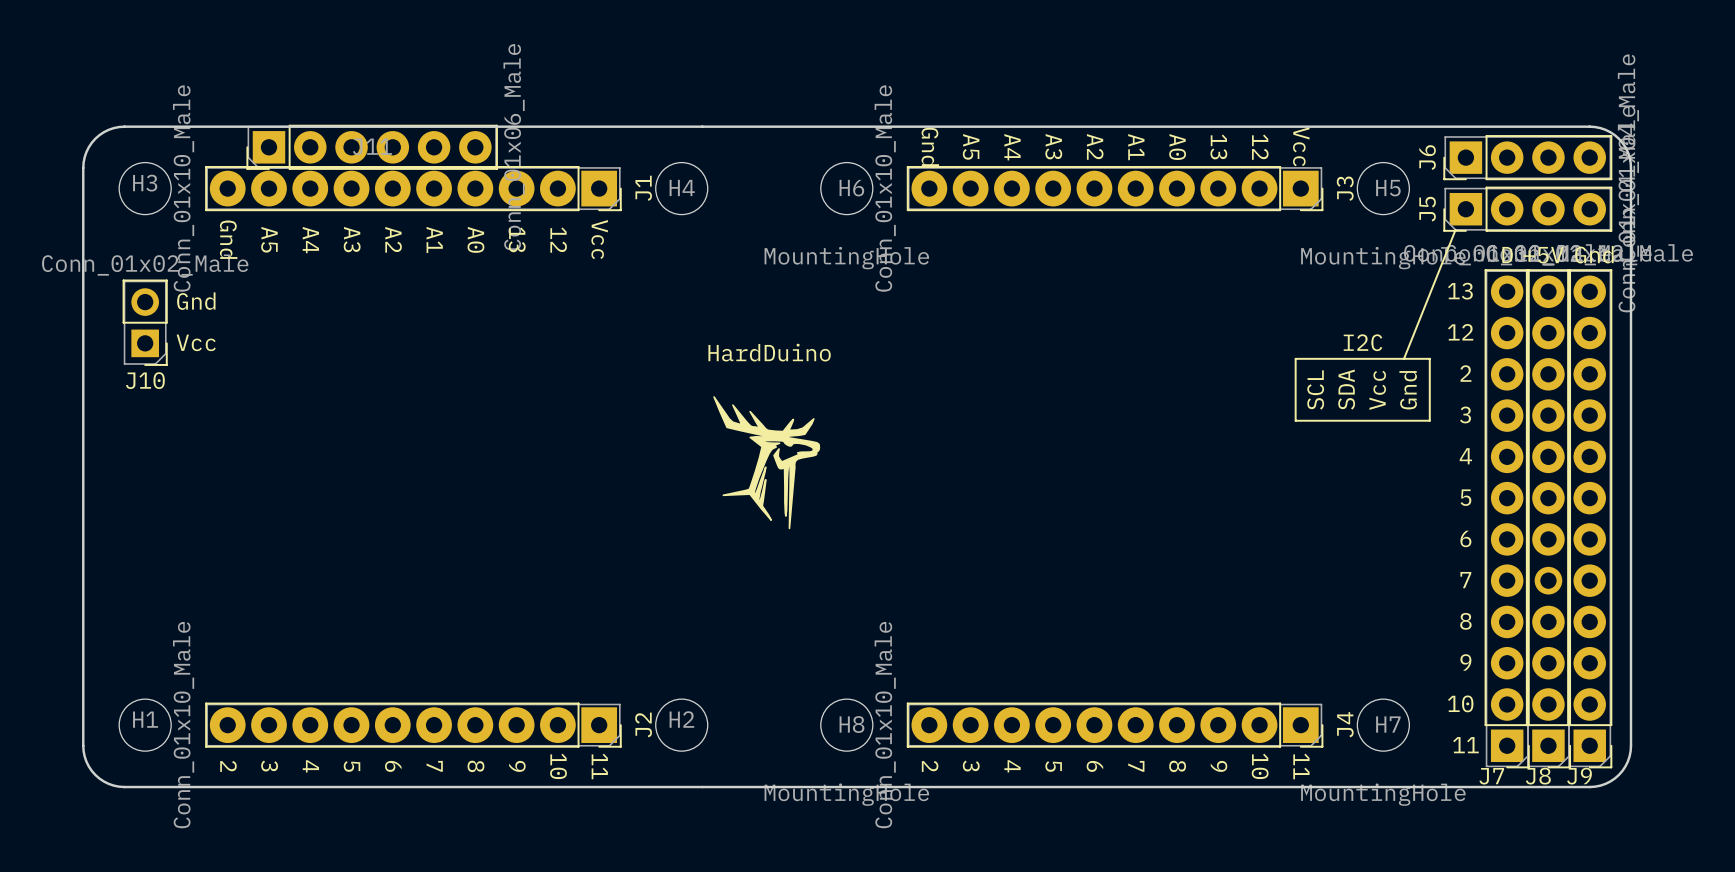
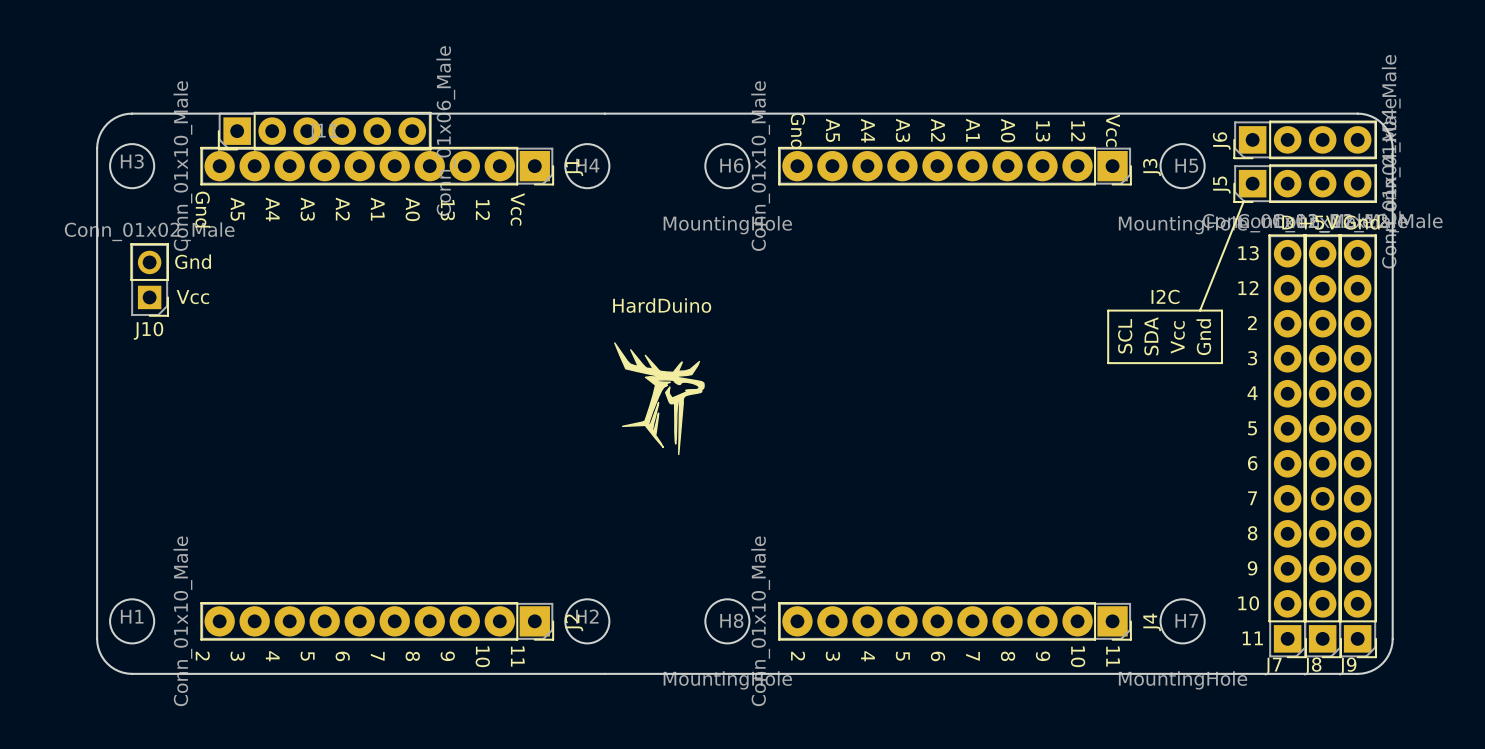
board edge: (145, 126) (119, 127) (103, 132) (88, 147) (83, 167) (83, 751) (91, 770) (103, 781) (119, 786) (145, 787) -> (132, 113) (118, 116) (107, 123) (99, 135) (97, 148) (97, 643) (101, 656) (110, 666) (118, 671) (132, 673)
J1 position: (413, 188) -> (377, 166)
text position: Gnd (196, 301) -> Gnd (193, 261)
J10 position: (145, 322) -> (149, 279)
text position: Vcc (196, 342) -> Vcc (192, 297)
J2 position: (413, 725) -> (377, 621)

